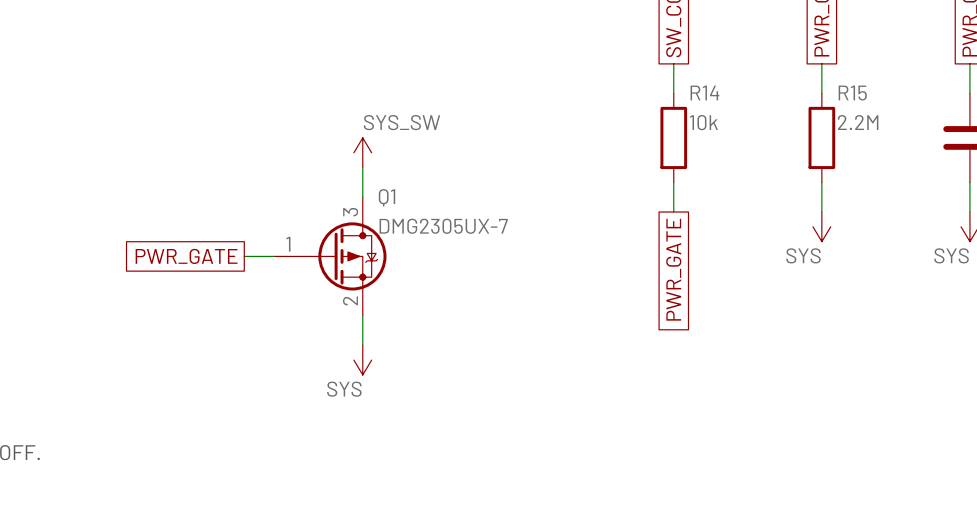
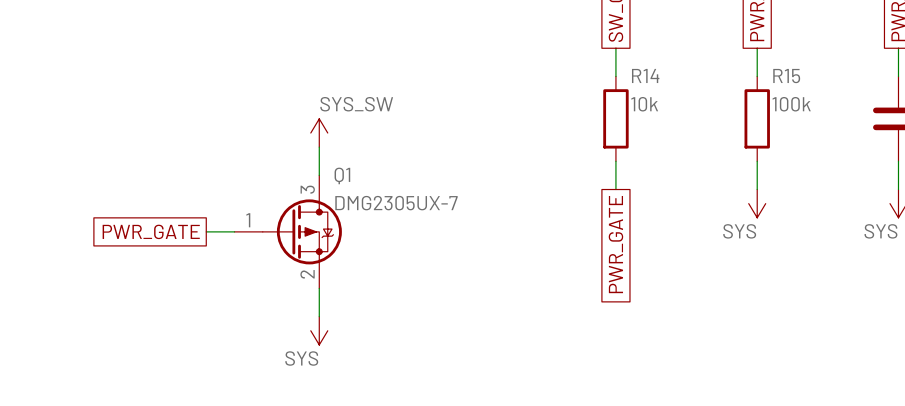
R15 value: 2.2M (858, 122) -> 100k (791, 104)

